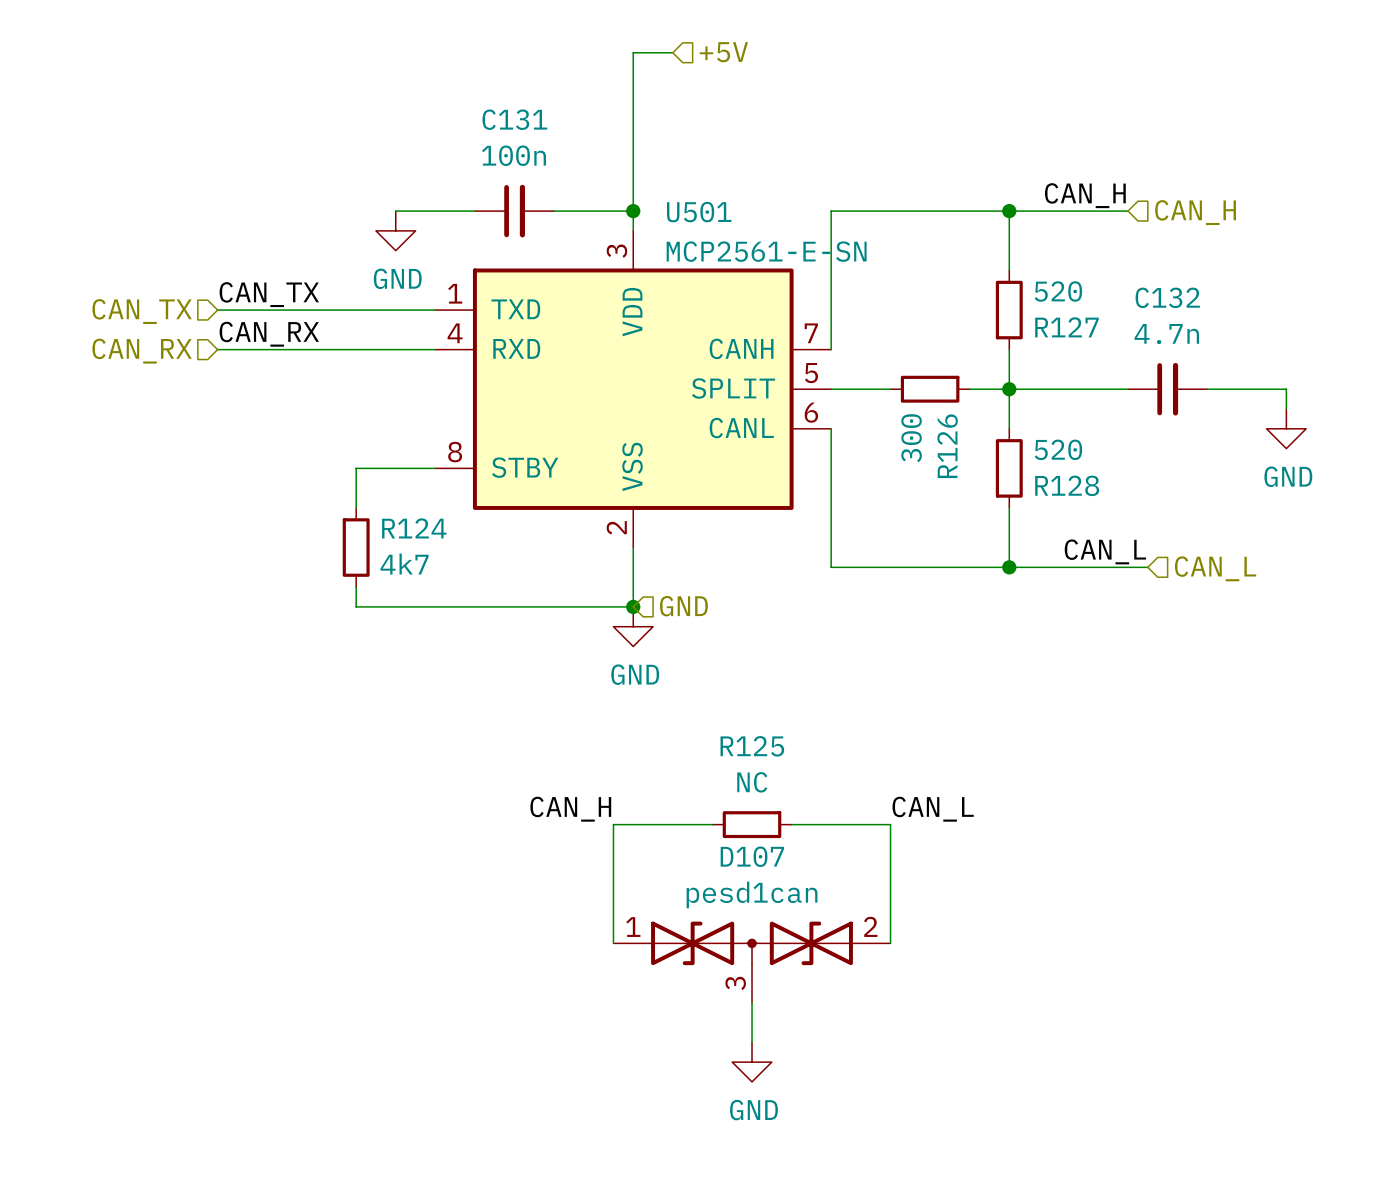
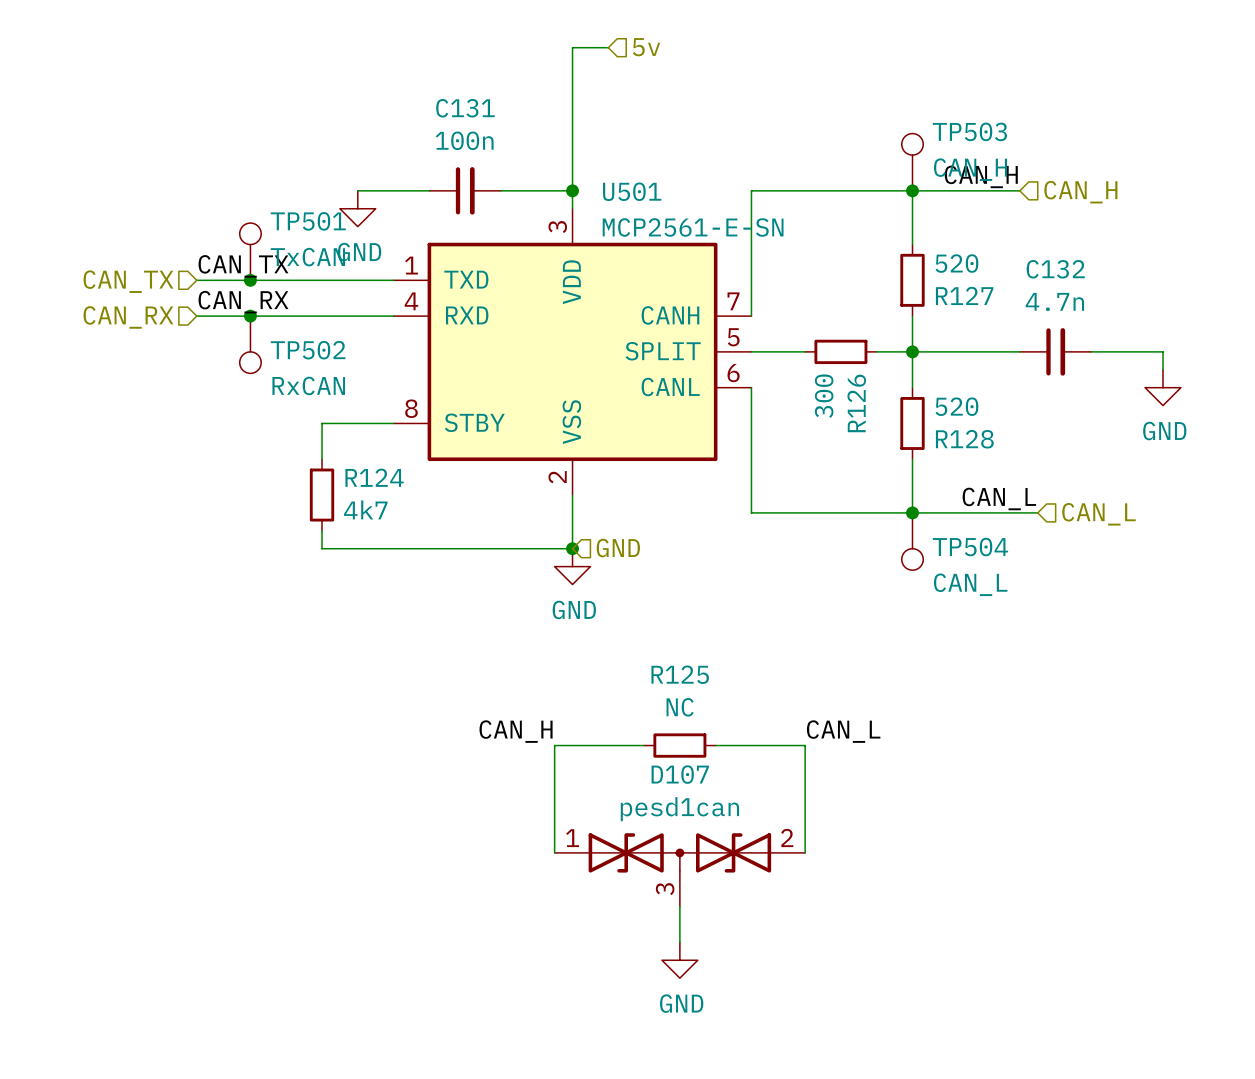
hierarchical label: +5V (723, 52) -> 5v (646, 47)
TP503: none -> CAN_H (912, 162)
TP501: none -> TxCAN (250, 251)
junction: none -> (250, 280)
junction: none -> (250, 316)
TP502: none -> RxCAN (250, 344)
TP504: none -> CAN_L (912, 541)

